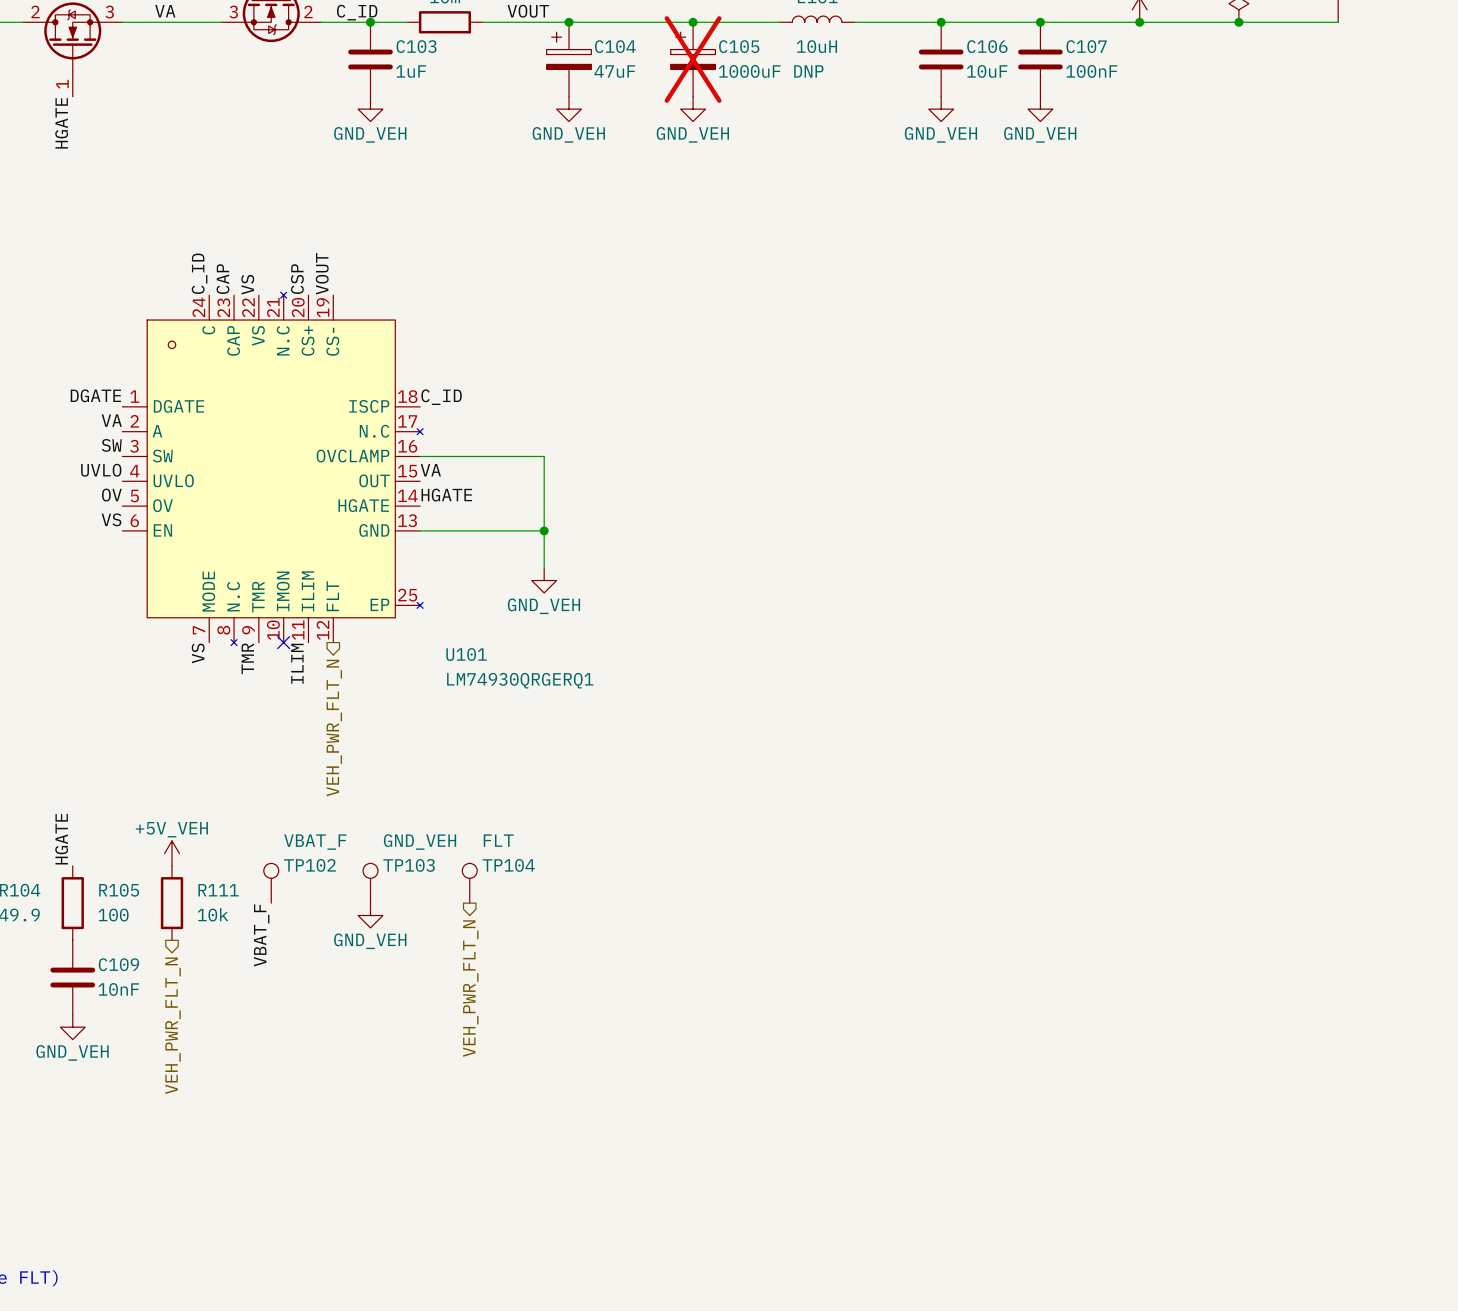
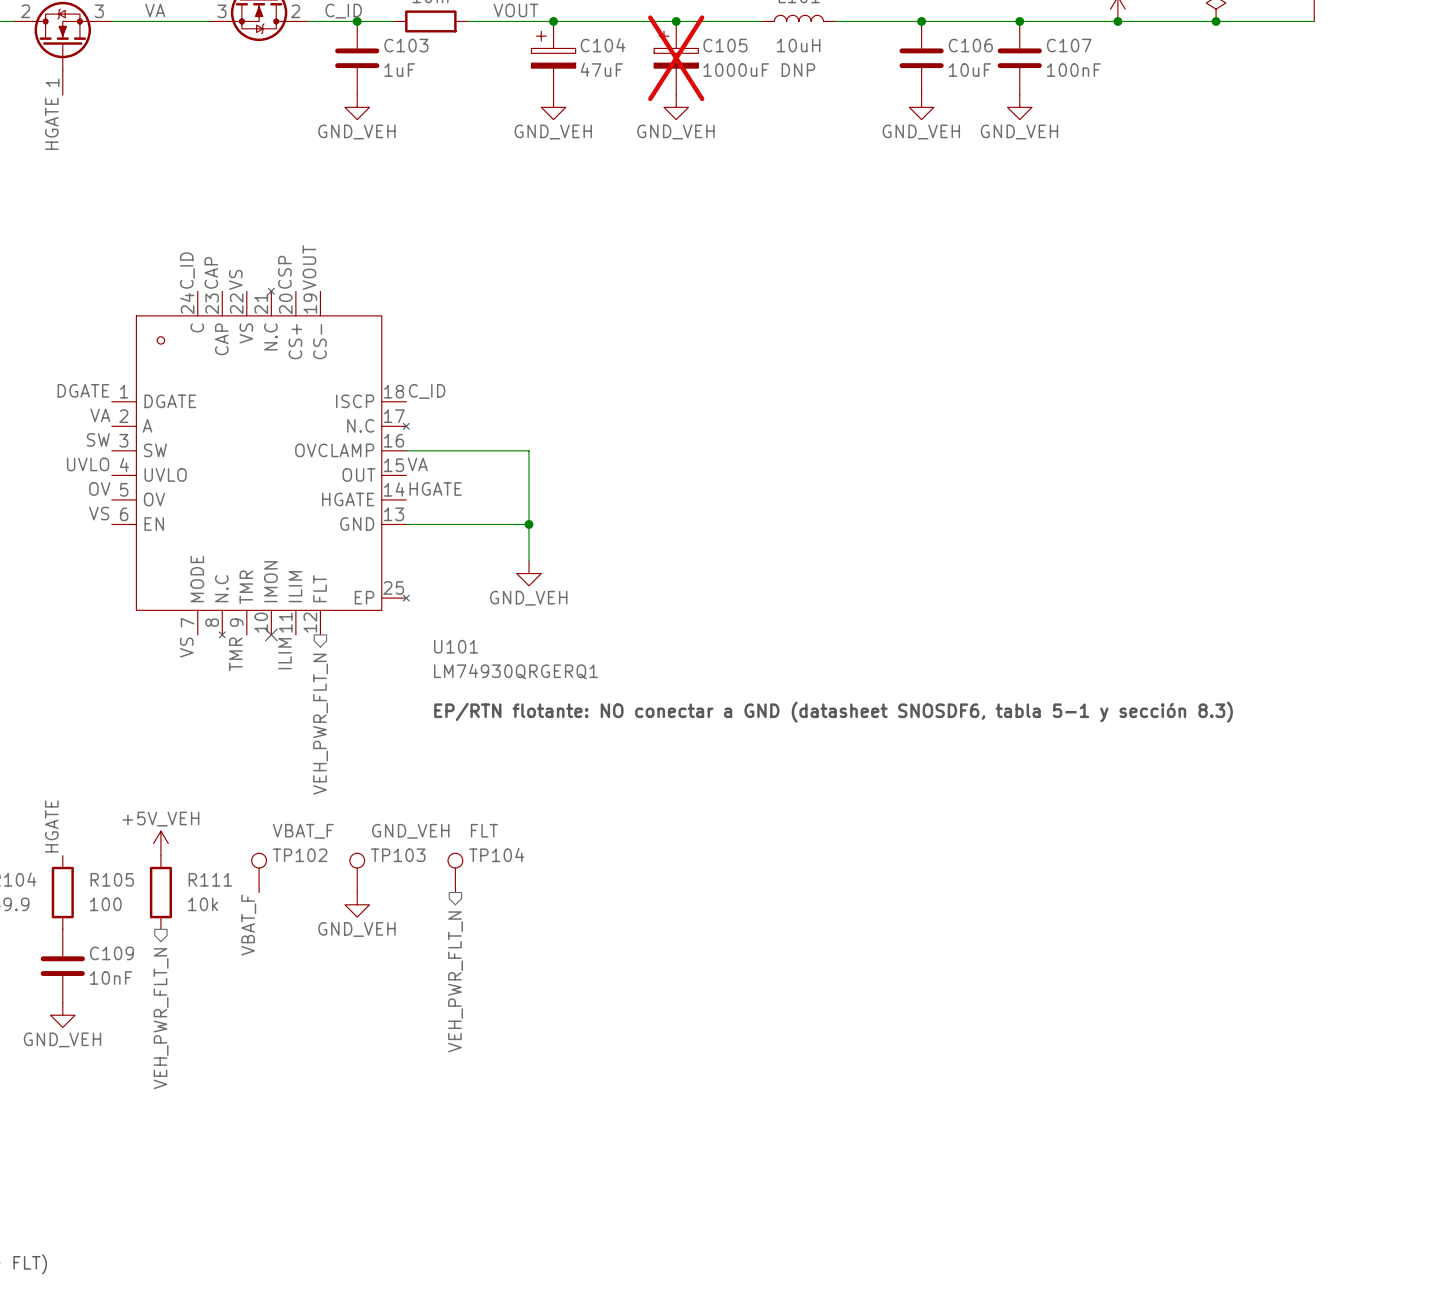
text: none -> EP/RTN flotante: NO conectar a GND (datasheet SNOSDF6, tabla 5-1 y sección 8.3) (833, 712)

